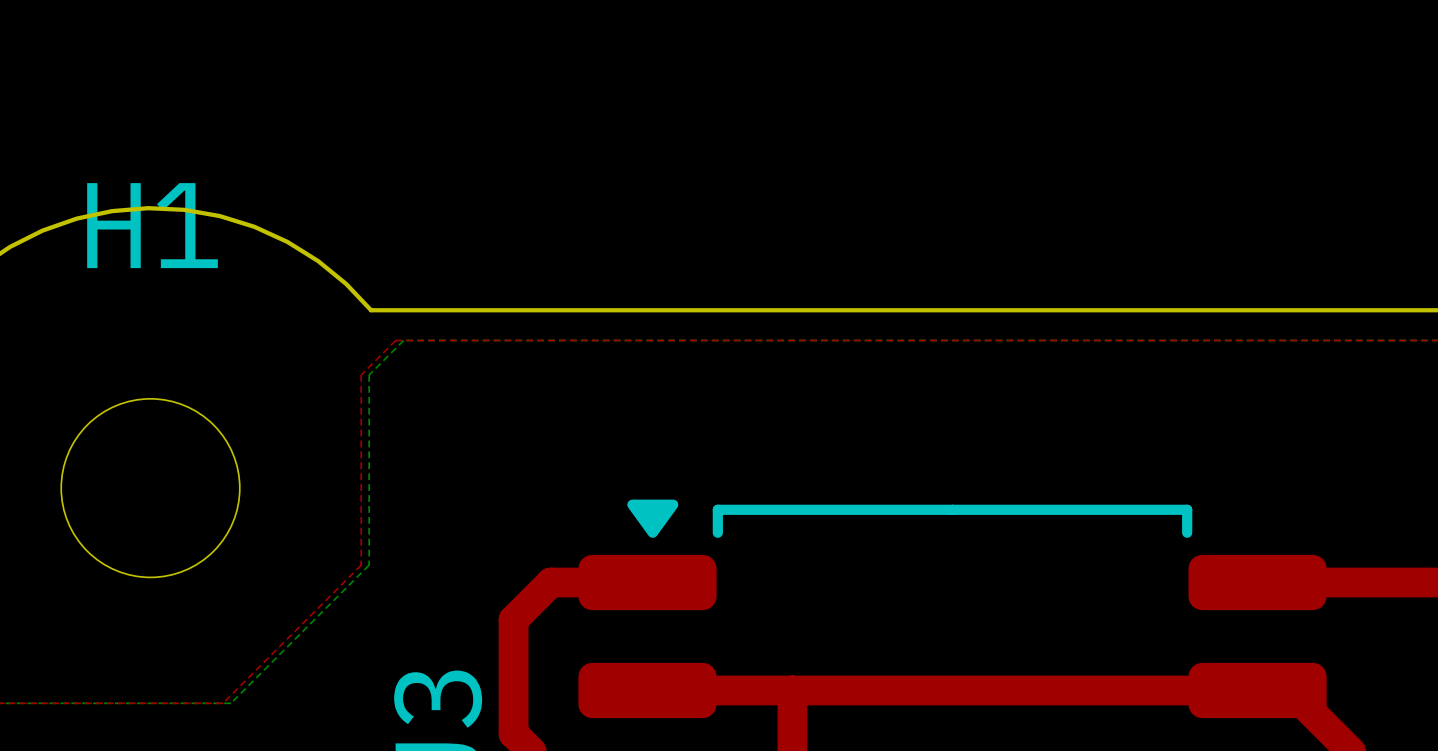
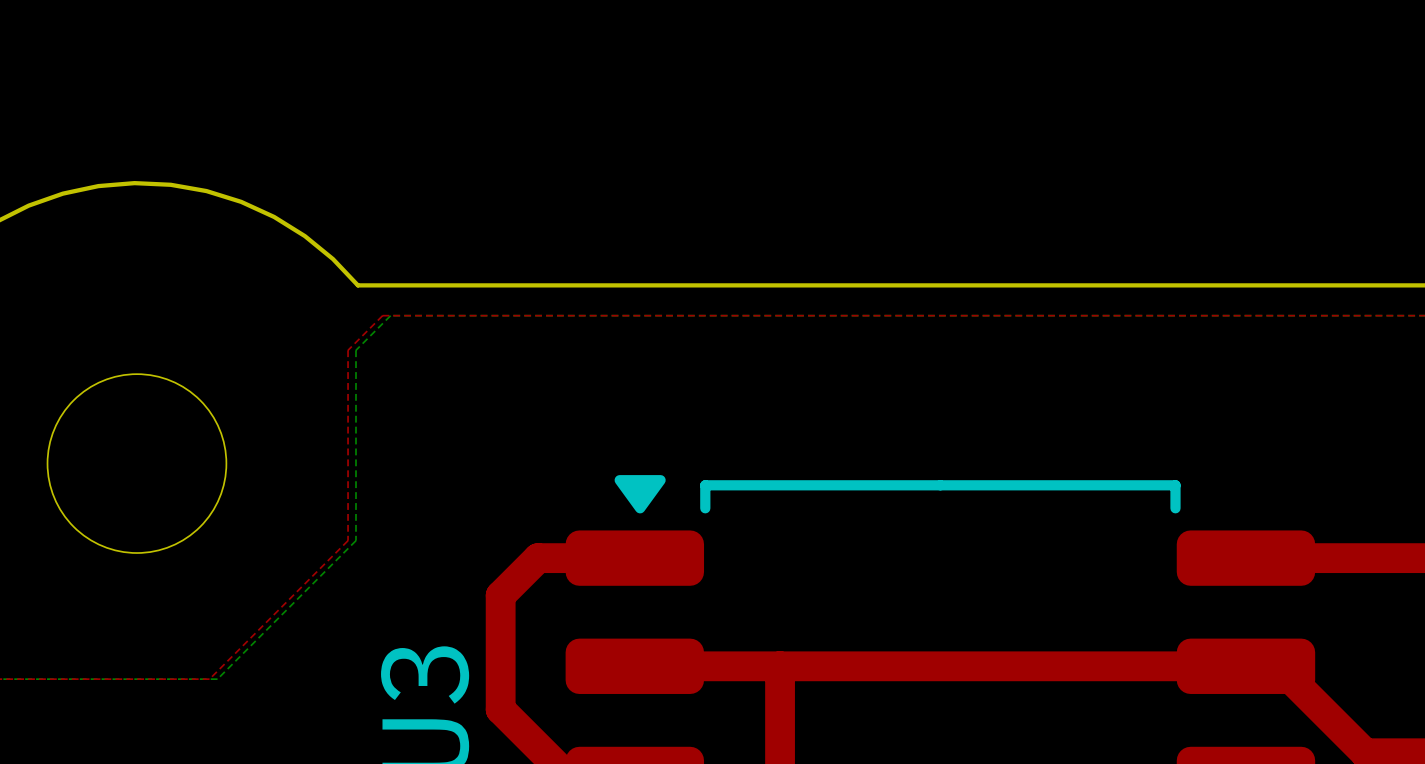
H1 name: H1 (152, 225) -> none

